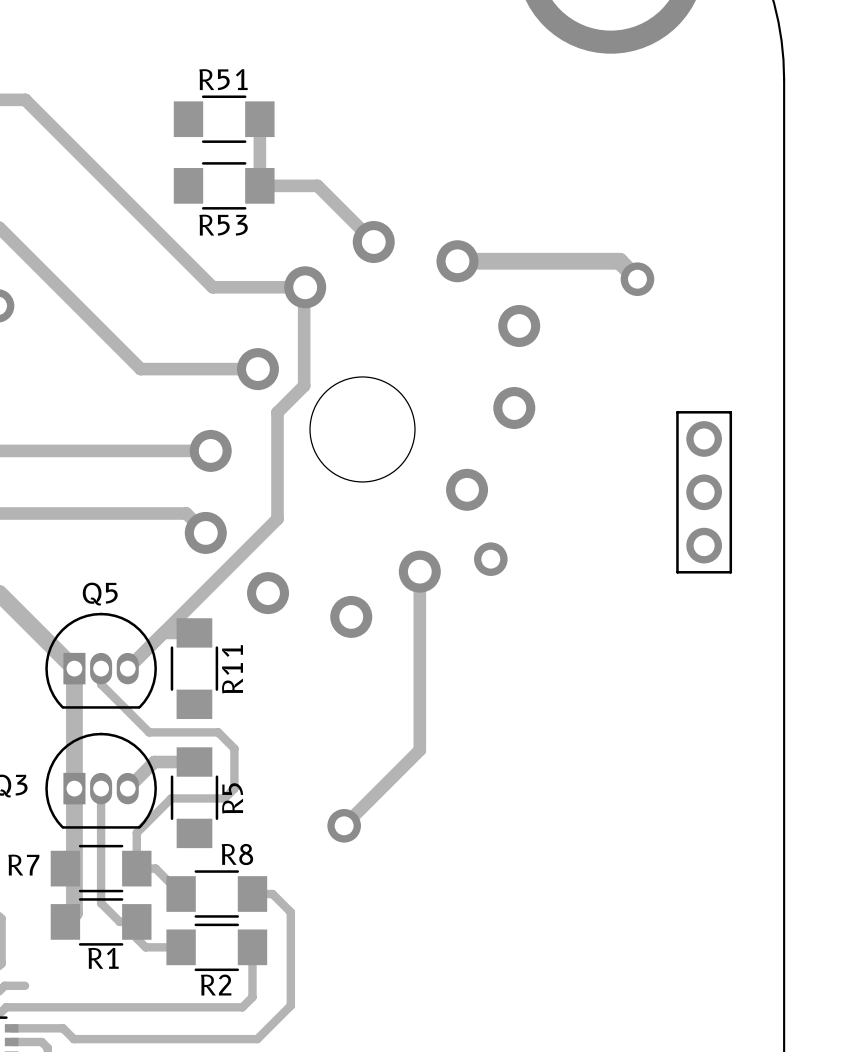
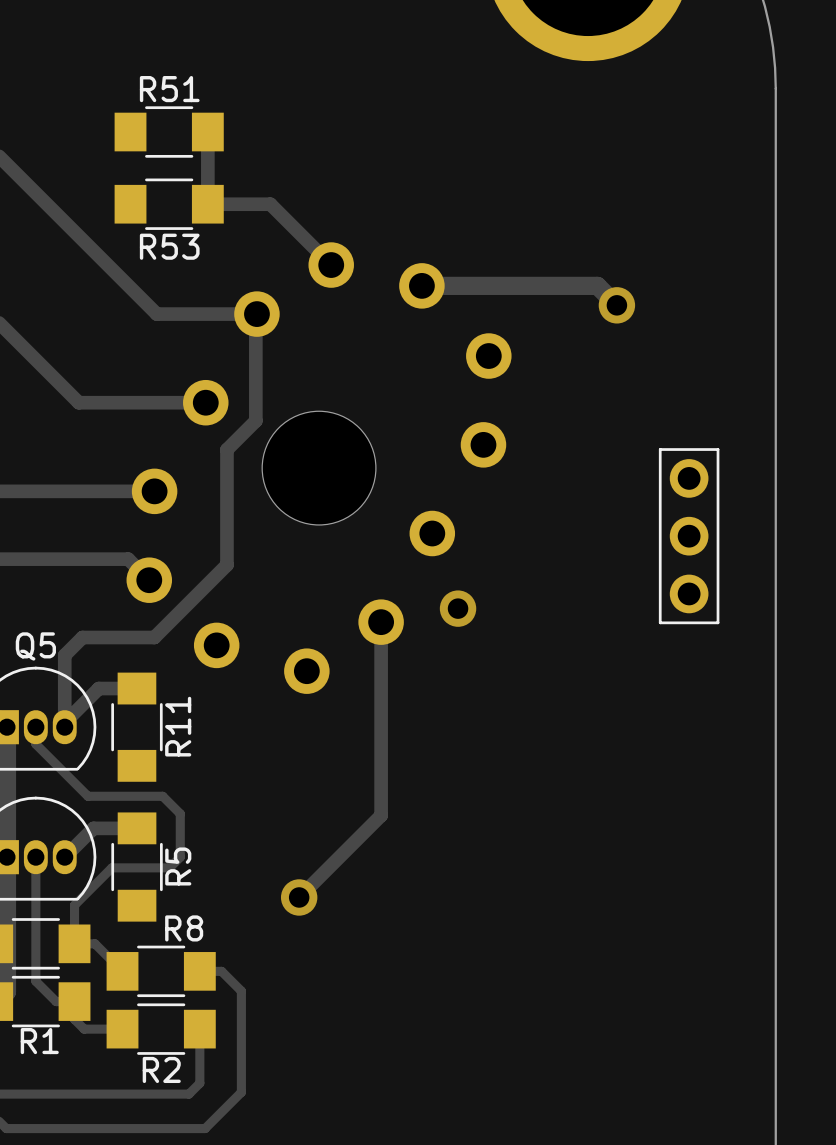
track: (210, 585) (127, 668) -> (154, 637) (82, 637) (64, 655) (64, 722) (98, 688) (103, 688)

